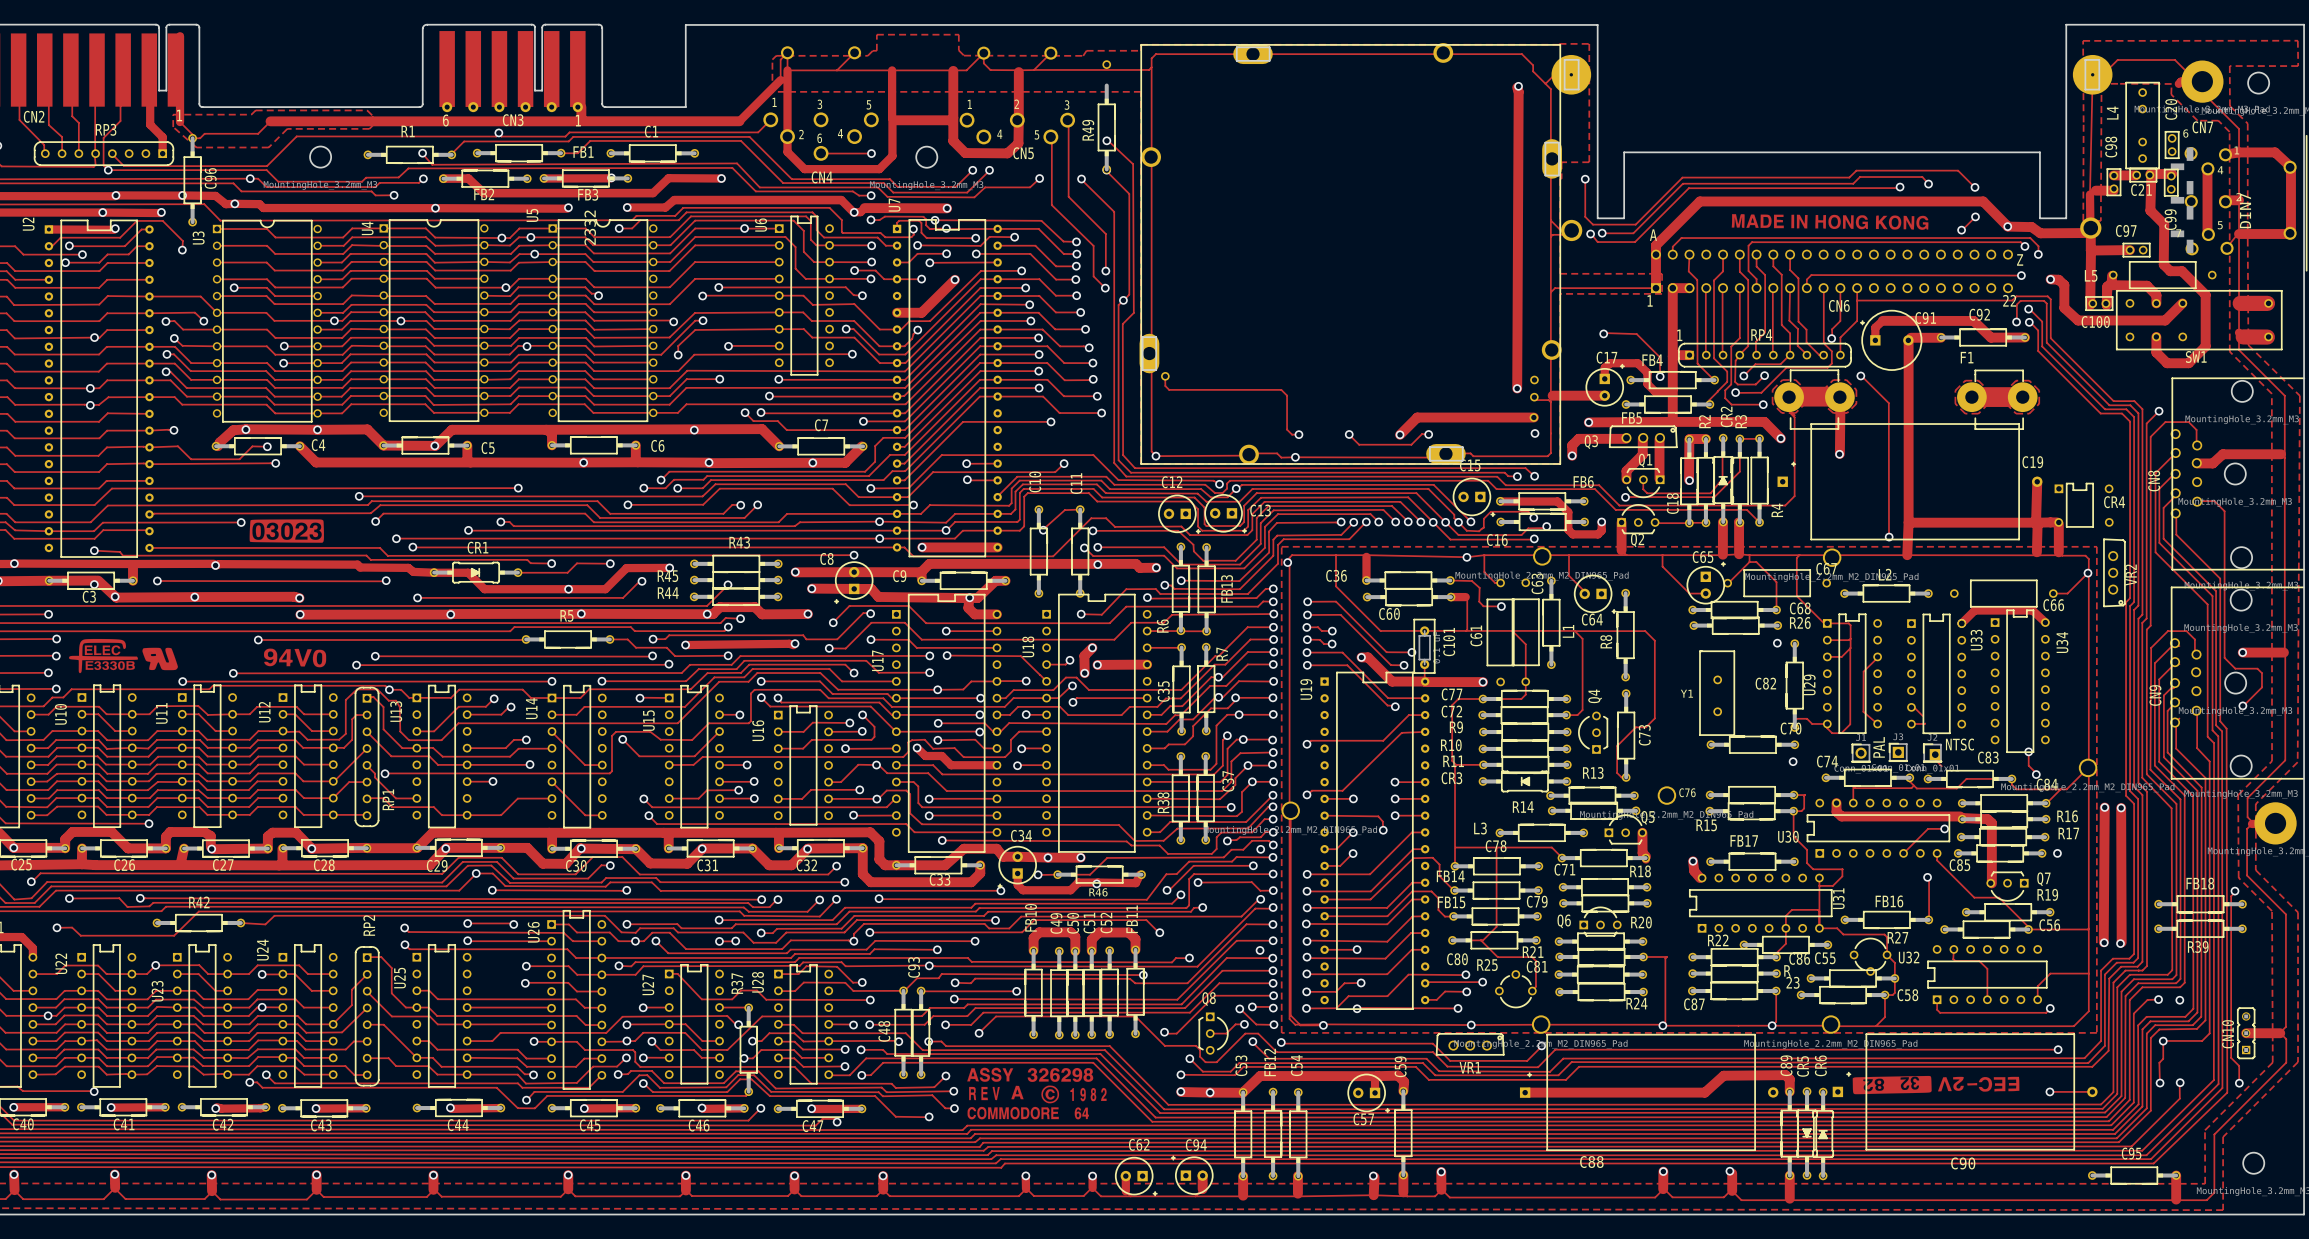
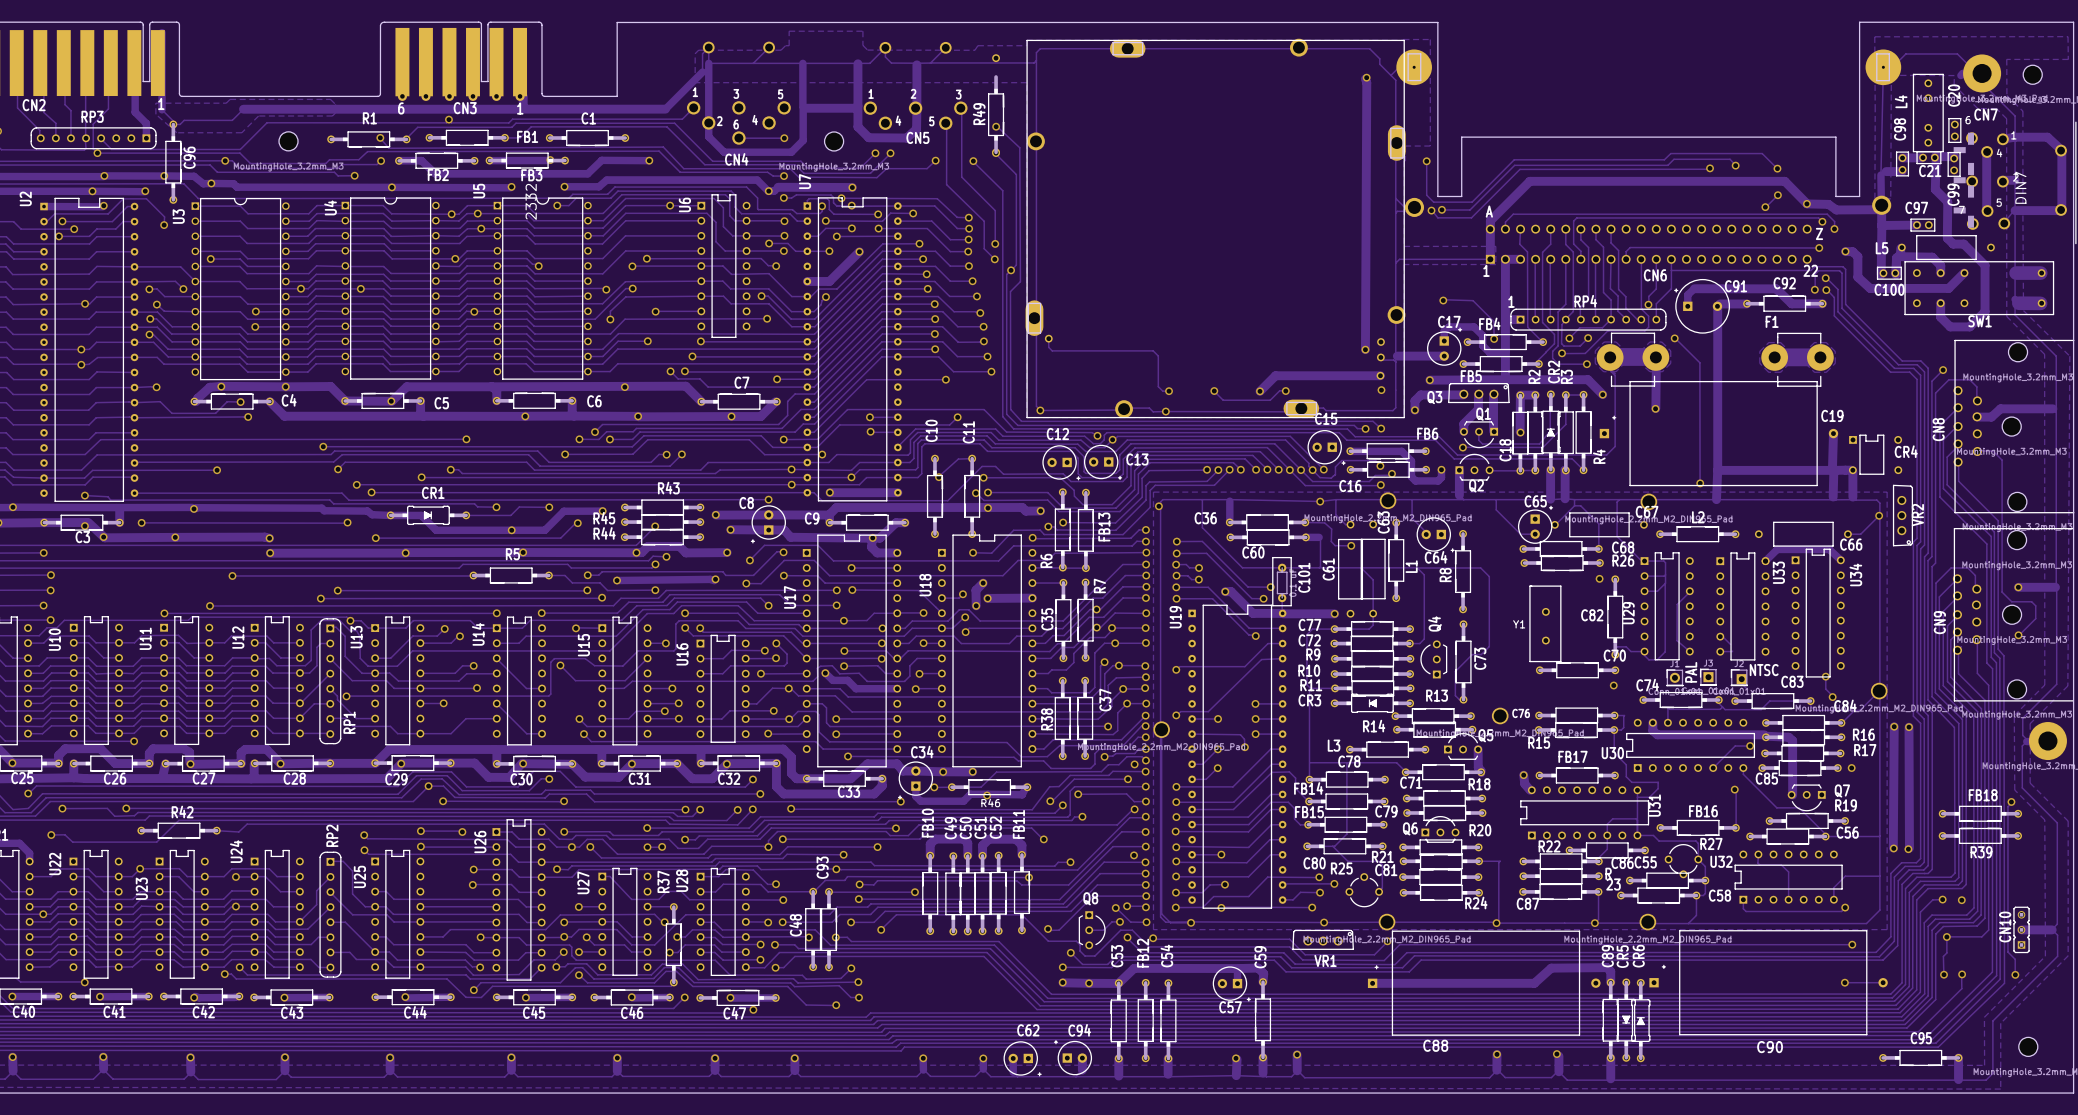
drawing: [69, 214, 2020, 1120] -> none

